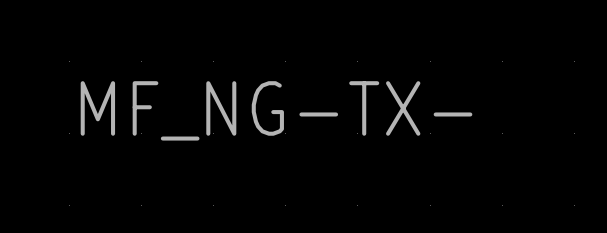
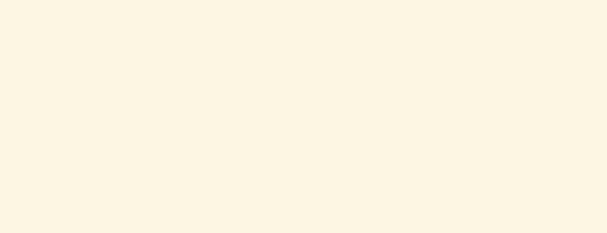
label: MF_NG-TX- (276, 110) -> none

